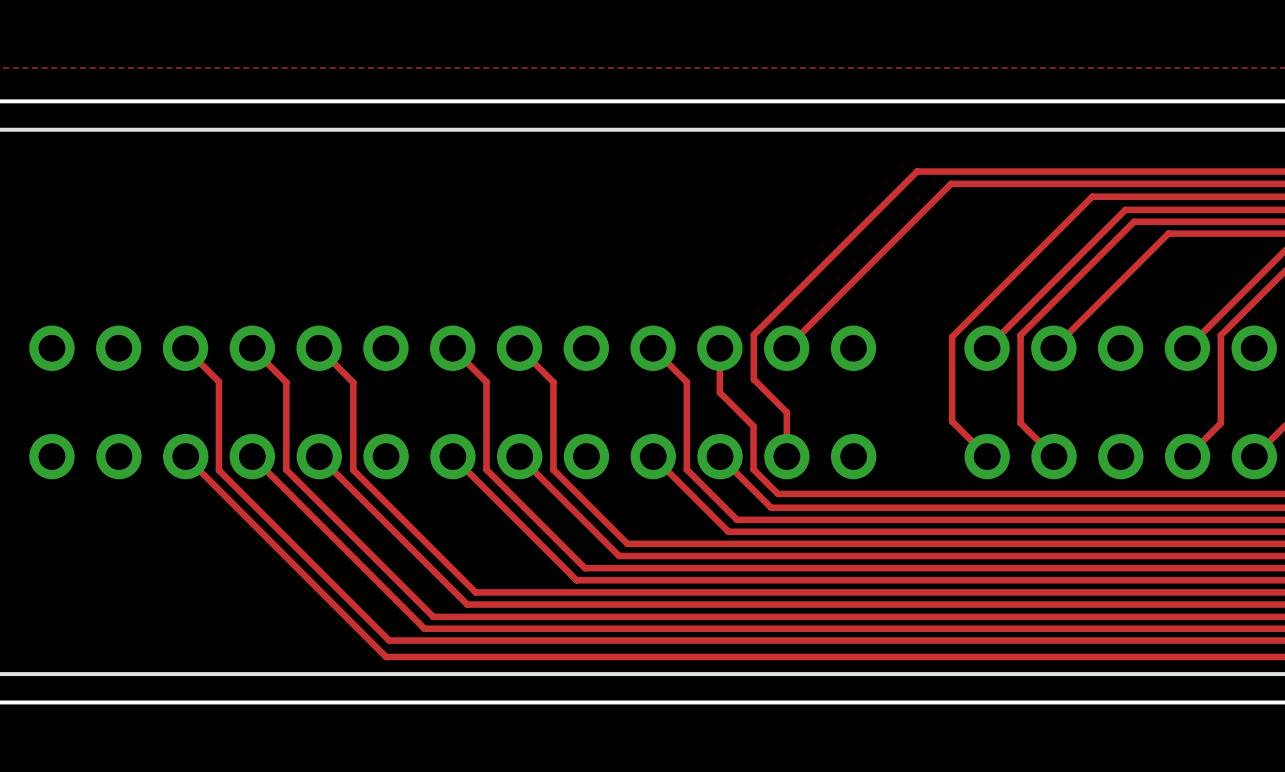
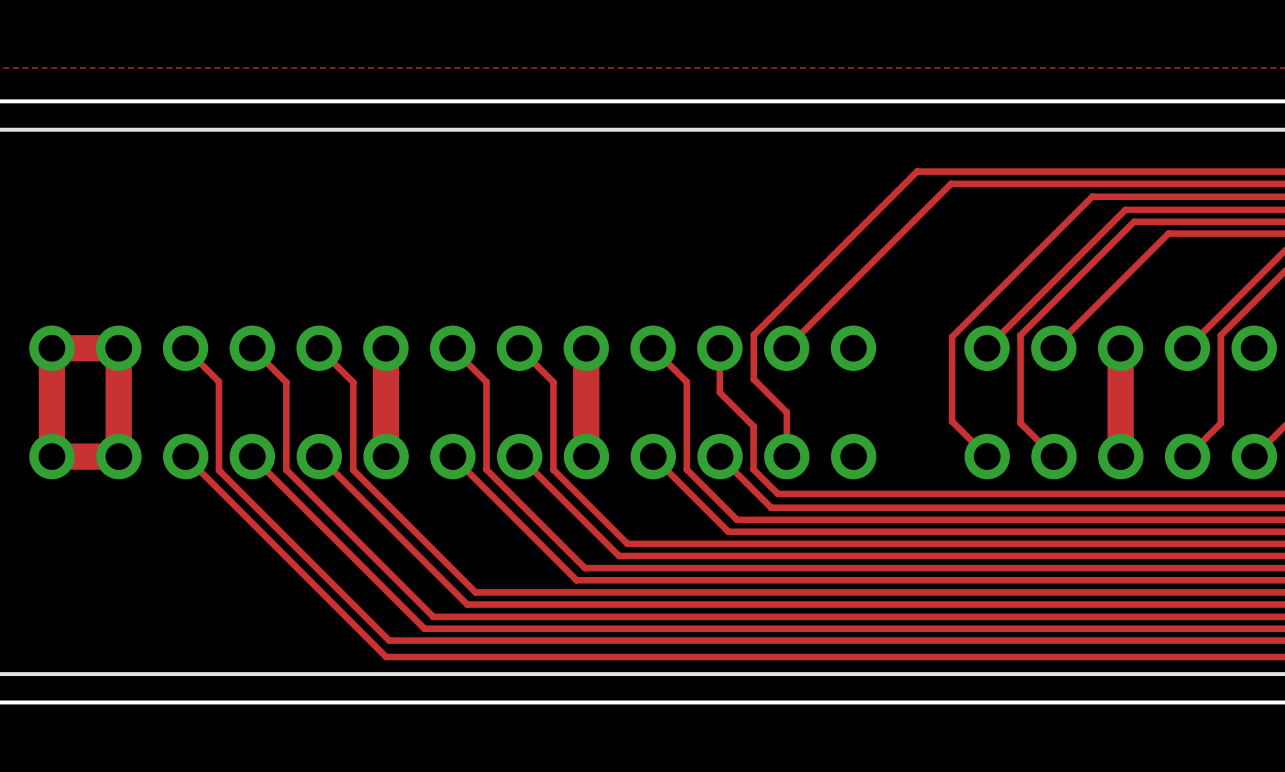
track: none -> (385, 348) (385, 456)
track: none -> (586, 348) (586, 456)
track: none -> (1120, 348) (1120, 456)
track: none -> (118, 456) (118, 348) (51, 348) (51, 456) (118, 456)

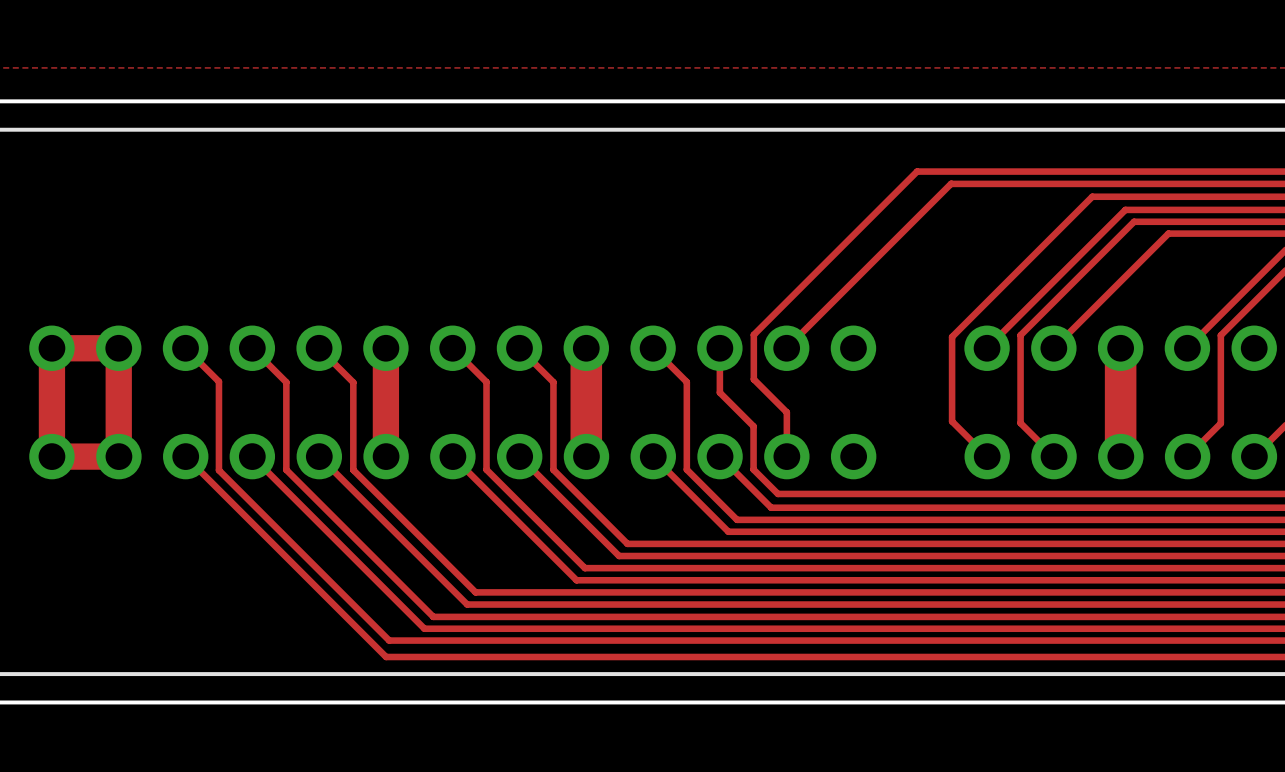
track width: thin (586, 348) (586, 456) -> thick (586, 348) (586, 456)
track width: thin (1120, 348) (1120, 456) -> thick (1120, 348) (1120, 456)

